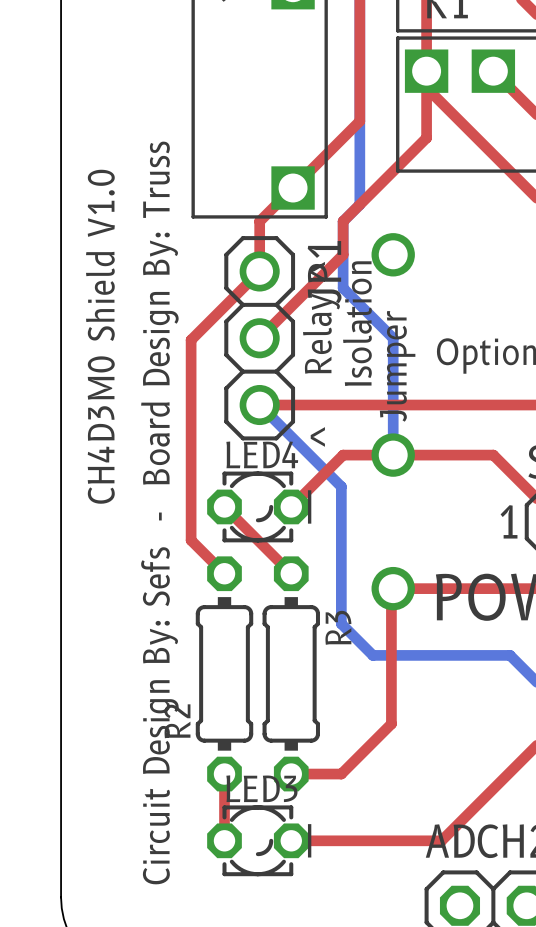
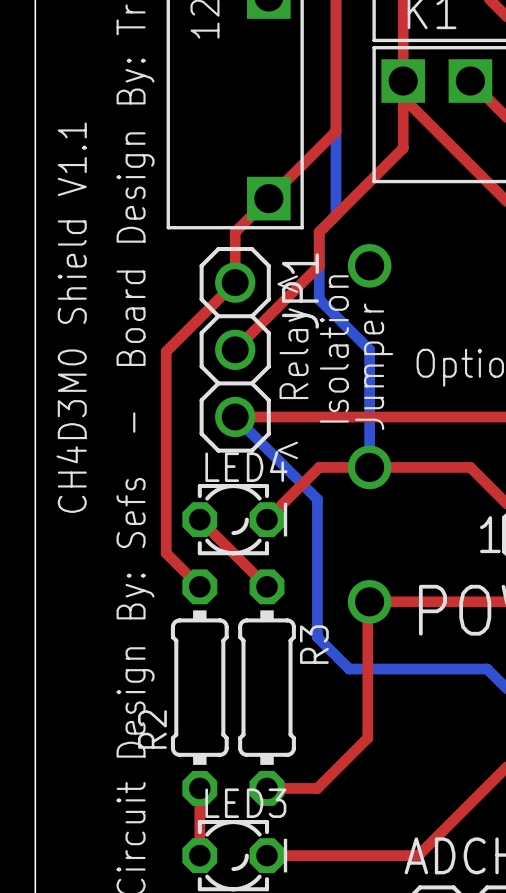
text: CH4D3M0 Shield V1.0 (100, 336) -> CH4D3M0 Shield V1.1 (71, 317)

